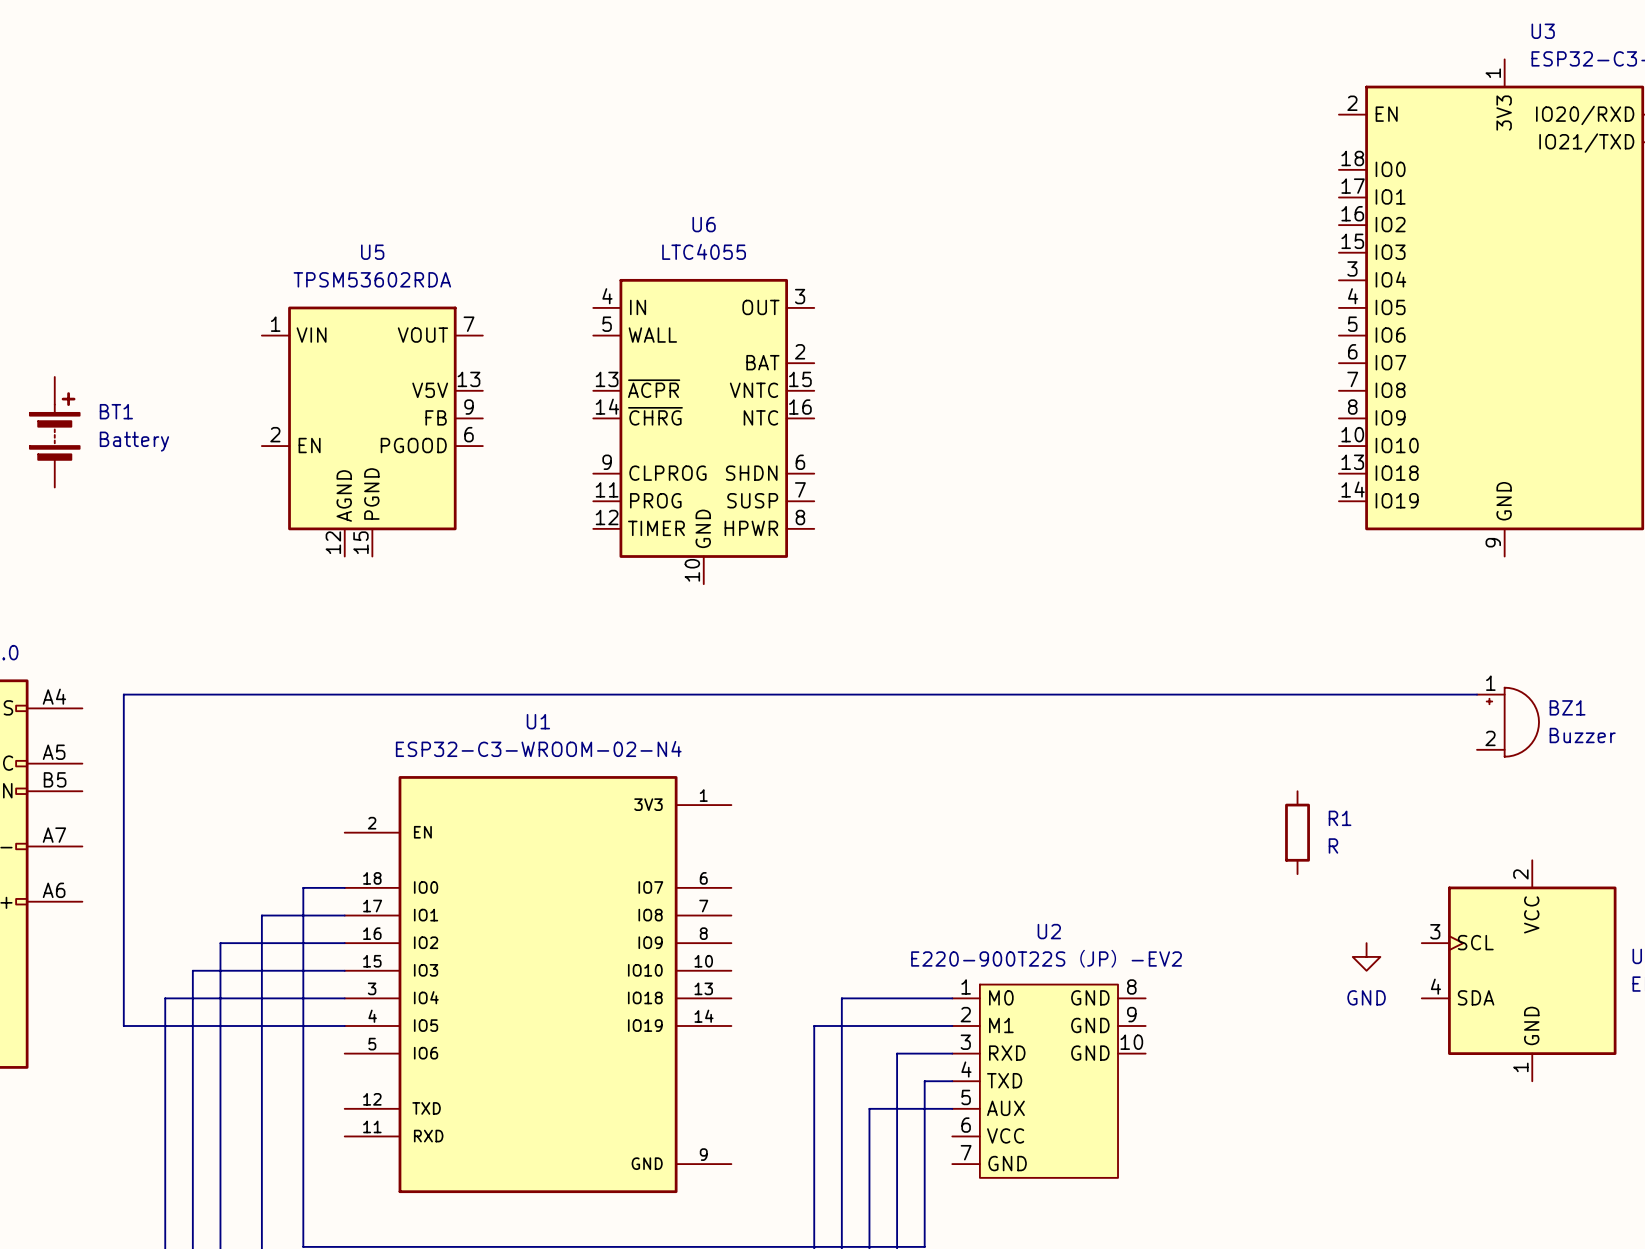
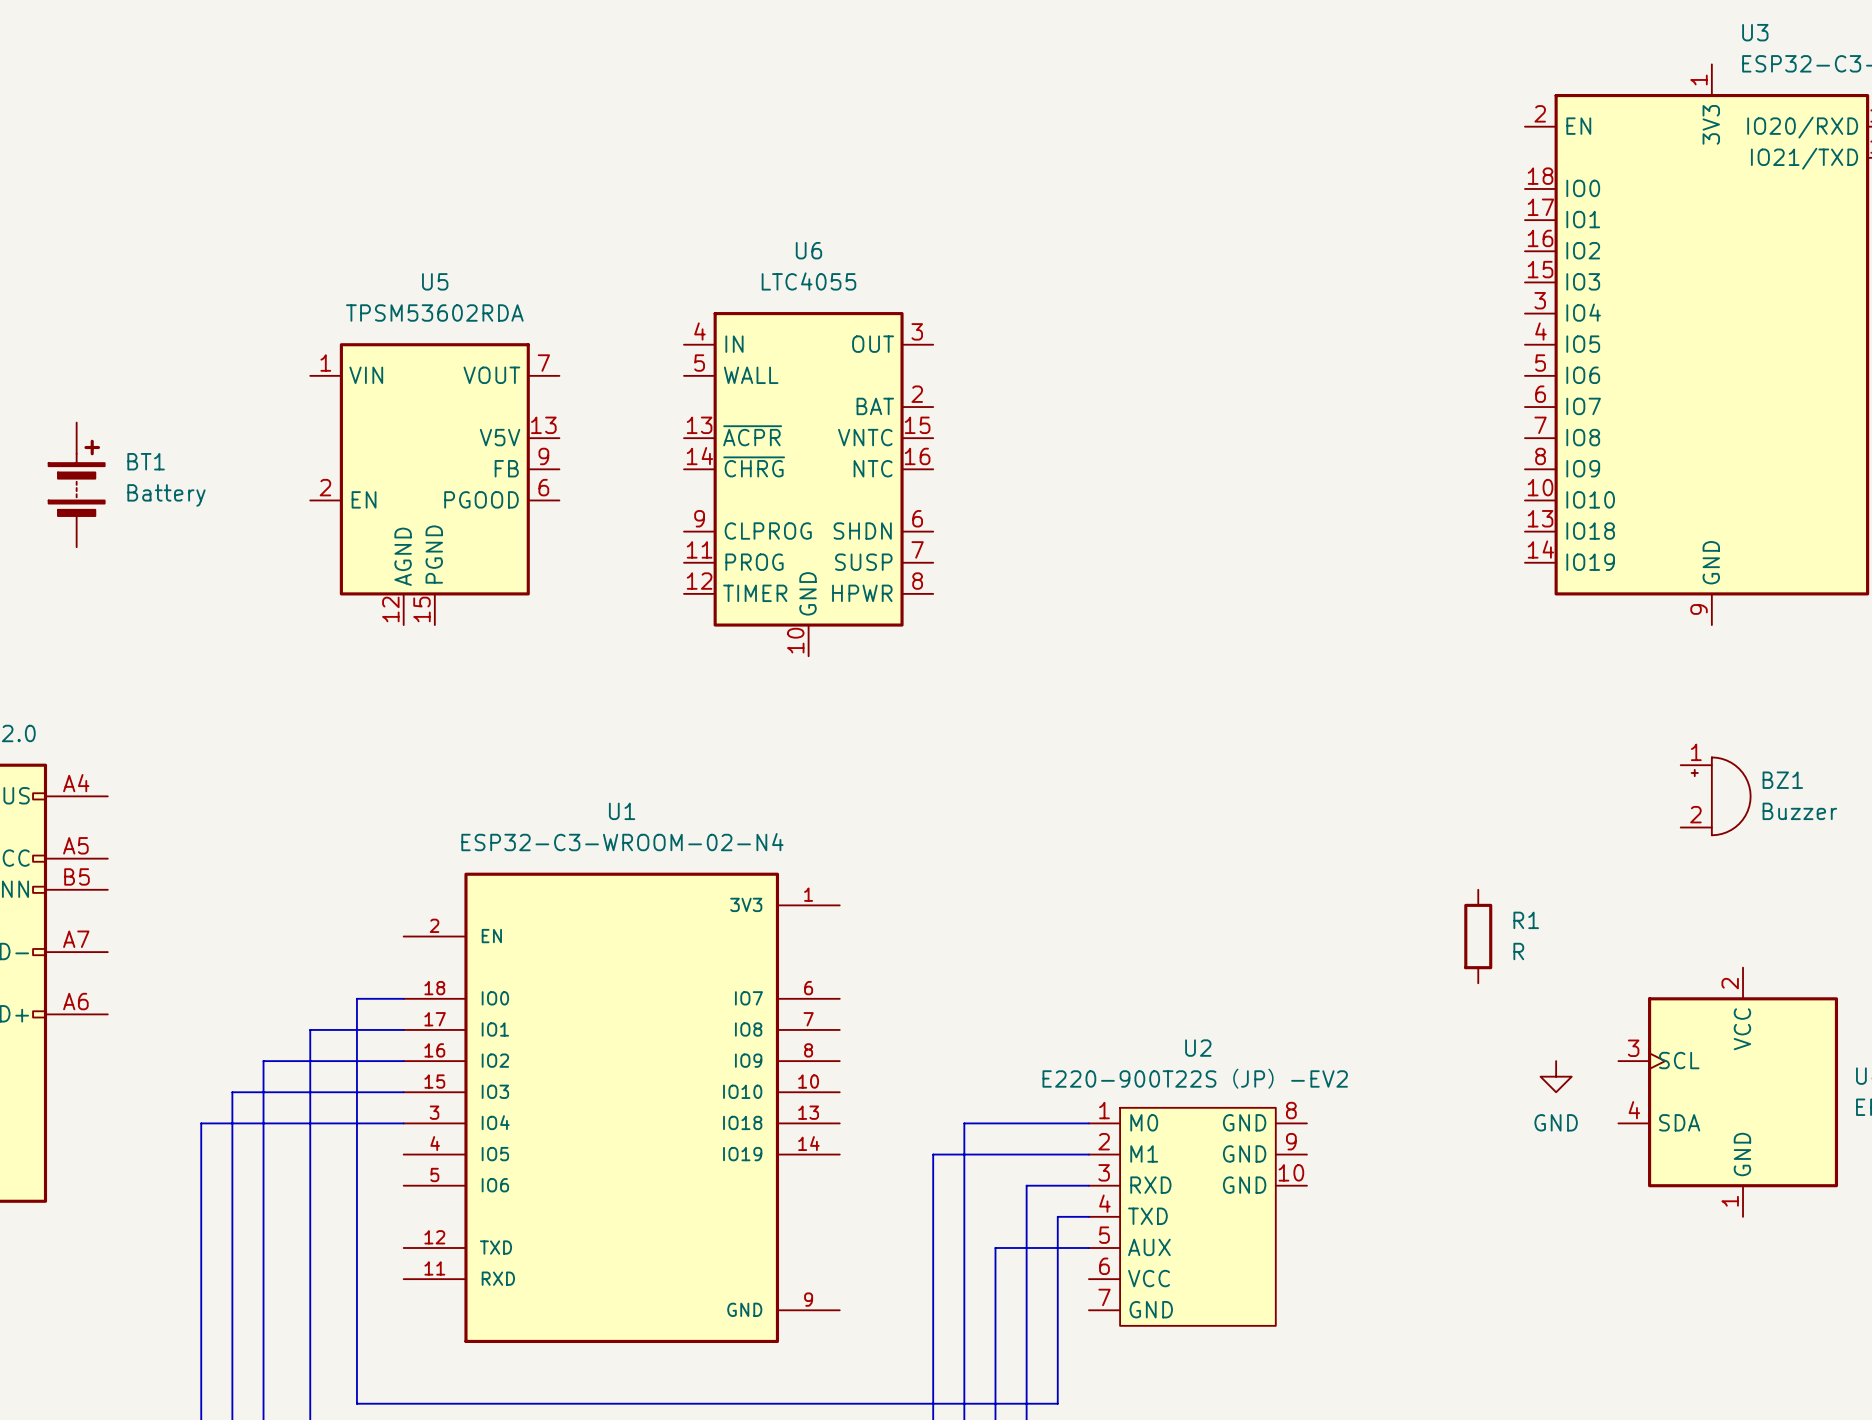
bus: (1477, 694) (123, 694) (123, 1025) (344, 1025) -> none
BZ1 position: (1508, 722) -> (1715, 796)

